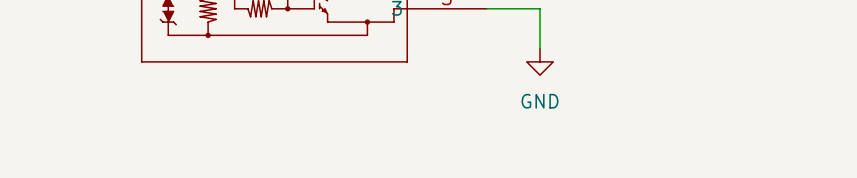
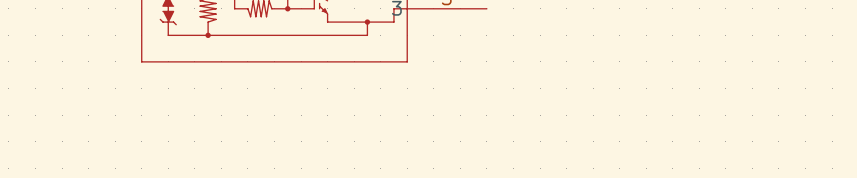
wire: (486, 8) (540, 8) (540, 48) -> none
power symbol: GND (540, 61) -> none

